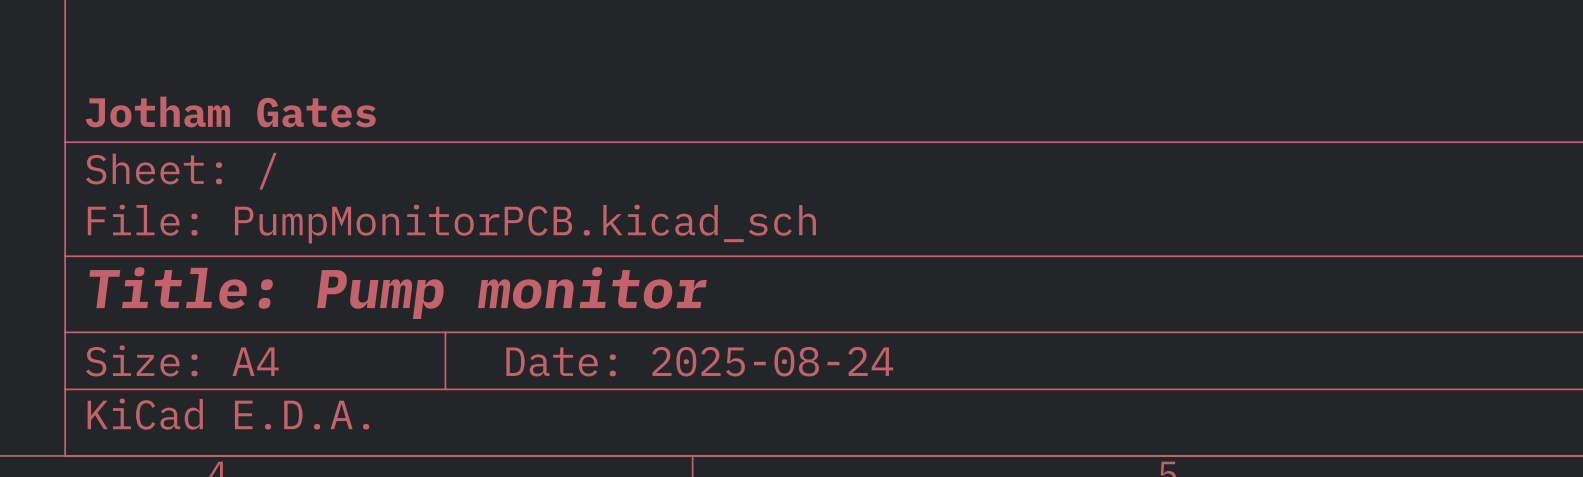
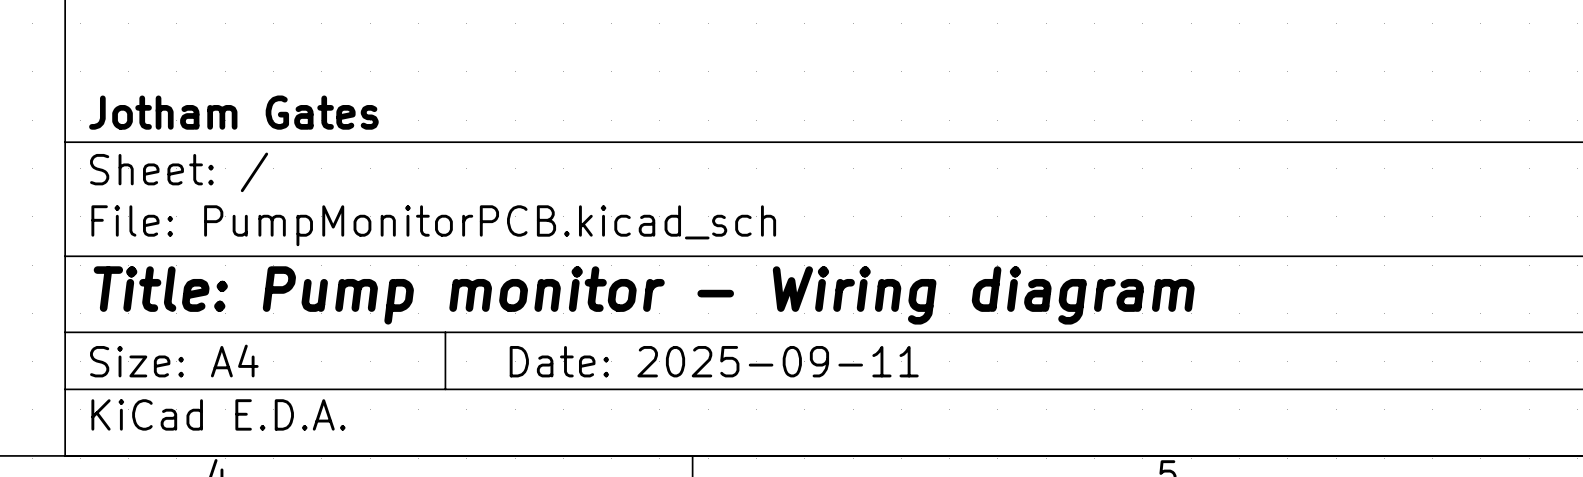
title block: Title: Pump monitor (398, 293) -> Title: Pump monitor - Wiring diagram (644, 295)
title block: Date: 2025-08-24 (699, 361) -> Date: 2025-09-11 (714, 361)

